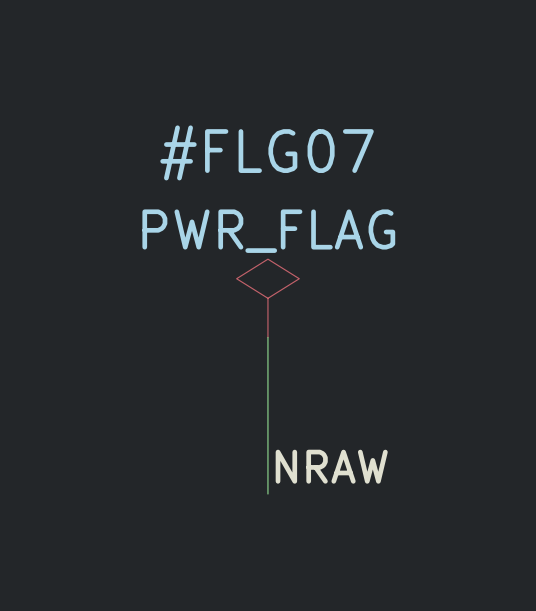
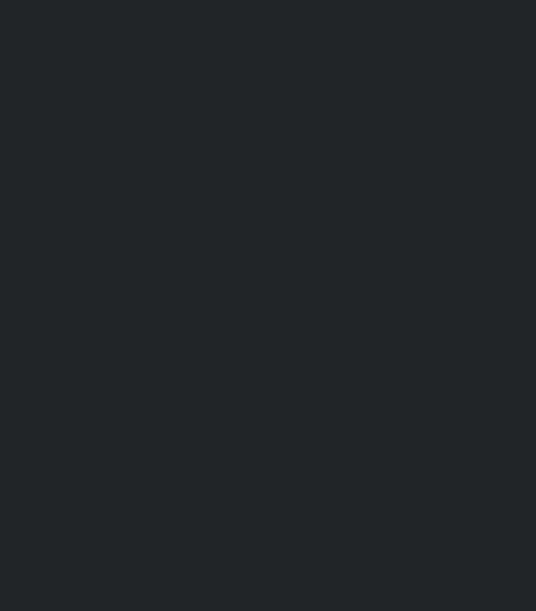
#FLG07: PWR_FLAG (267, 298) -> none
wire: (267, 337) (267, 494) -> none
label: NRAW (331, 466) -> none

